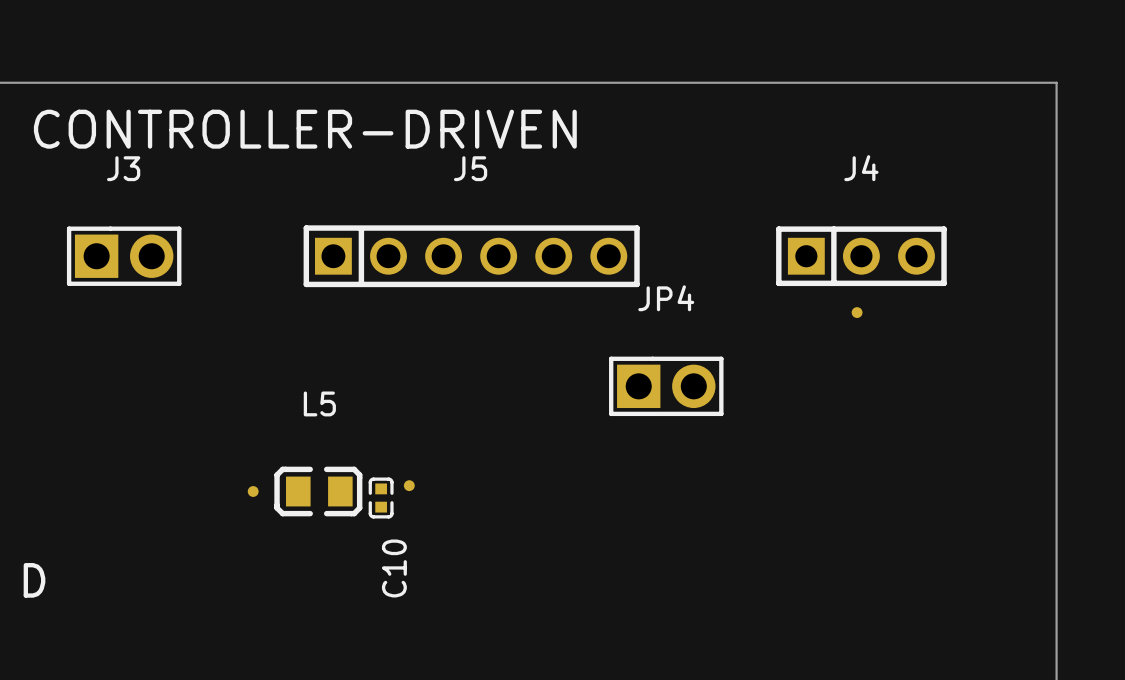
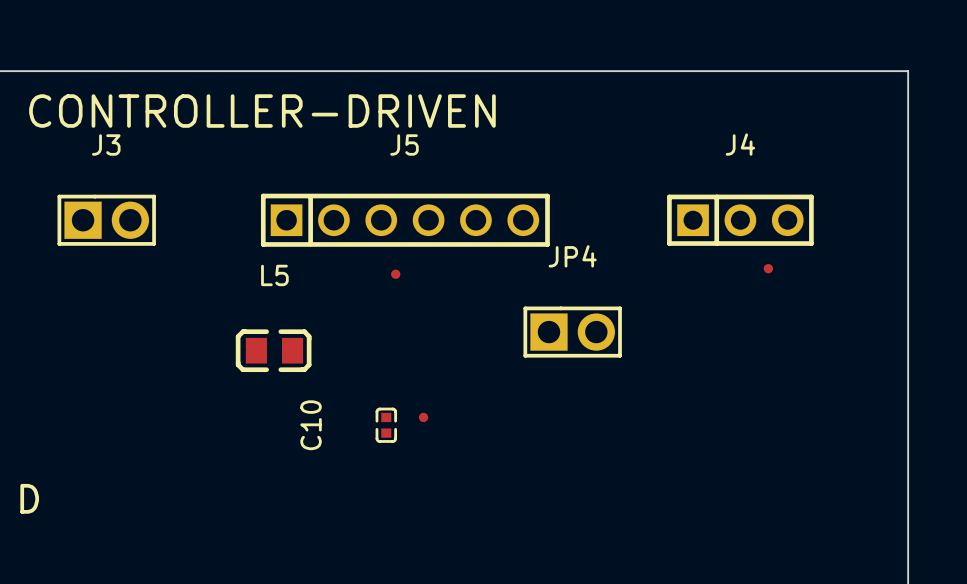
part position: (857, 312) -> (768, 268)
part: none -> (395, 274)
part position: (409, 485) -> (423, 417)
part: (253, 491) -> none
L5 position: (318, 491) -> (273, 350)
C10 position: (381, 498) -> (386, 425)
C10 name position: C10 (394, 568) -> C10 (311, 425)

